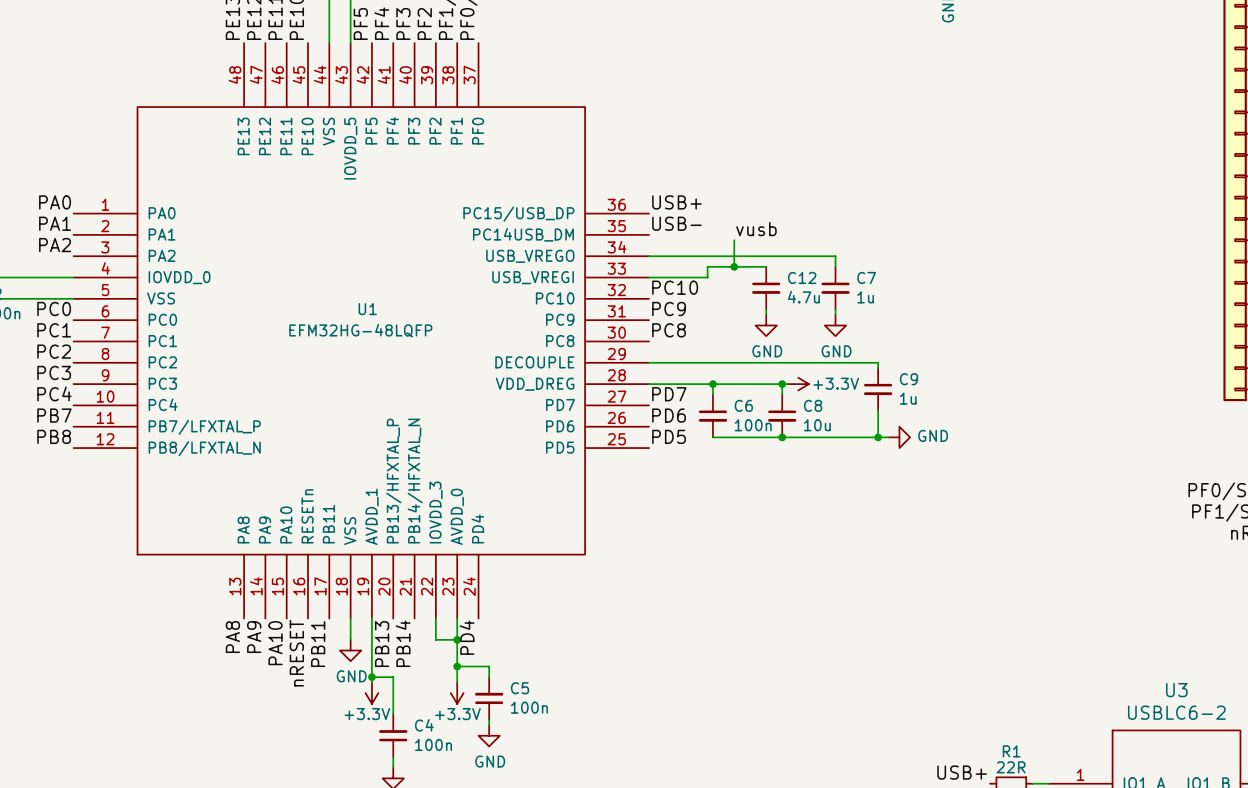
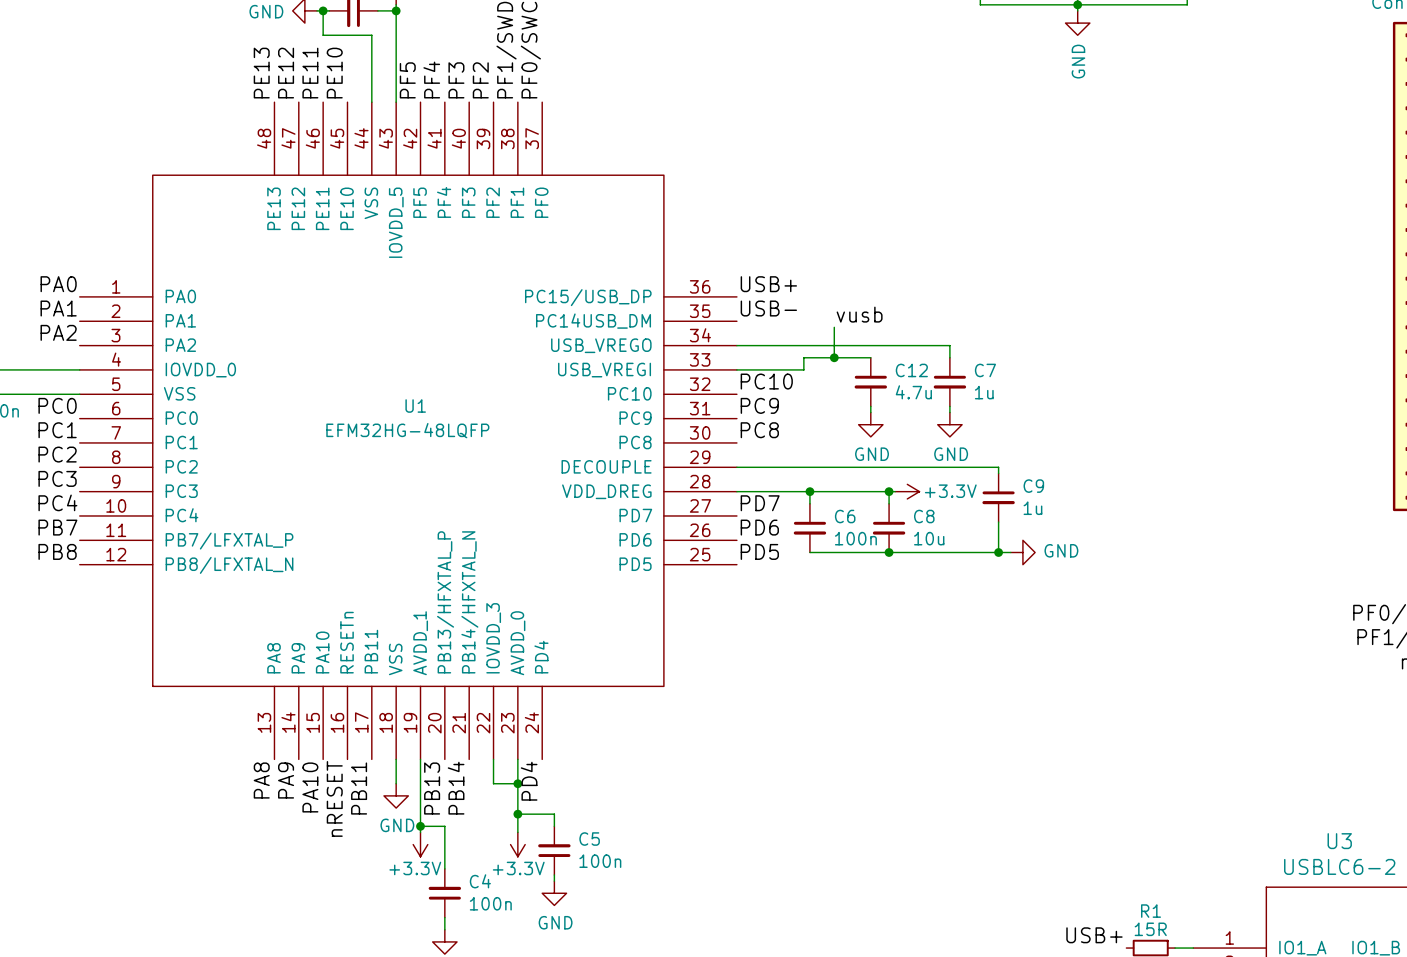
R1 value: 22R (1011, 767) -> 15R (1150, 929)

